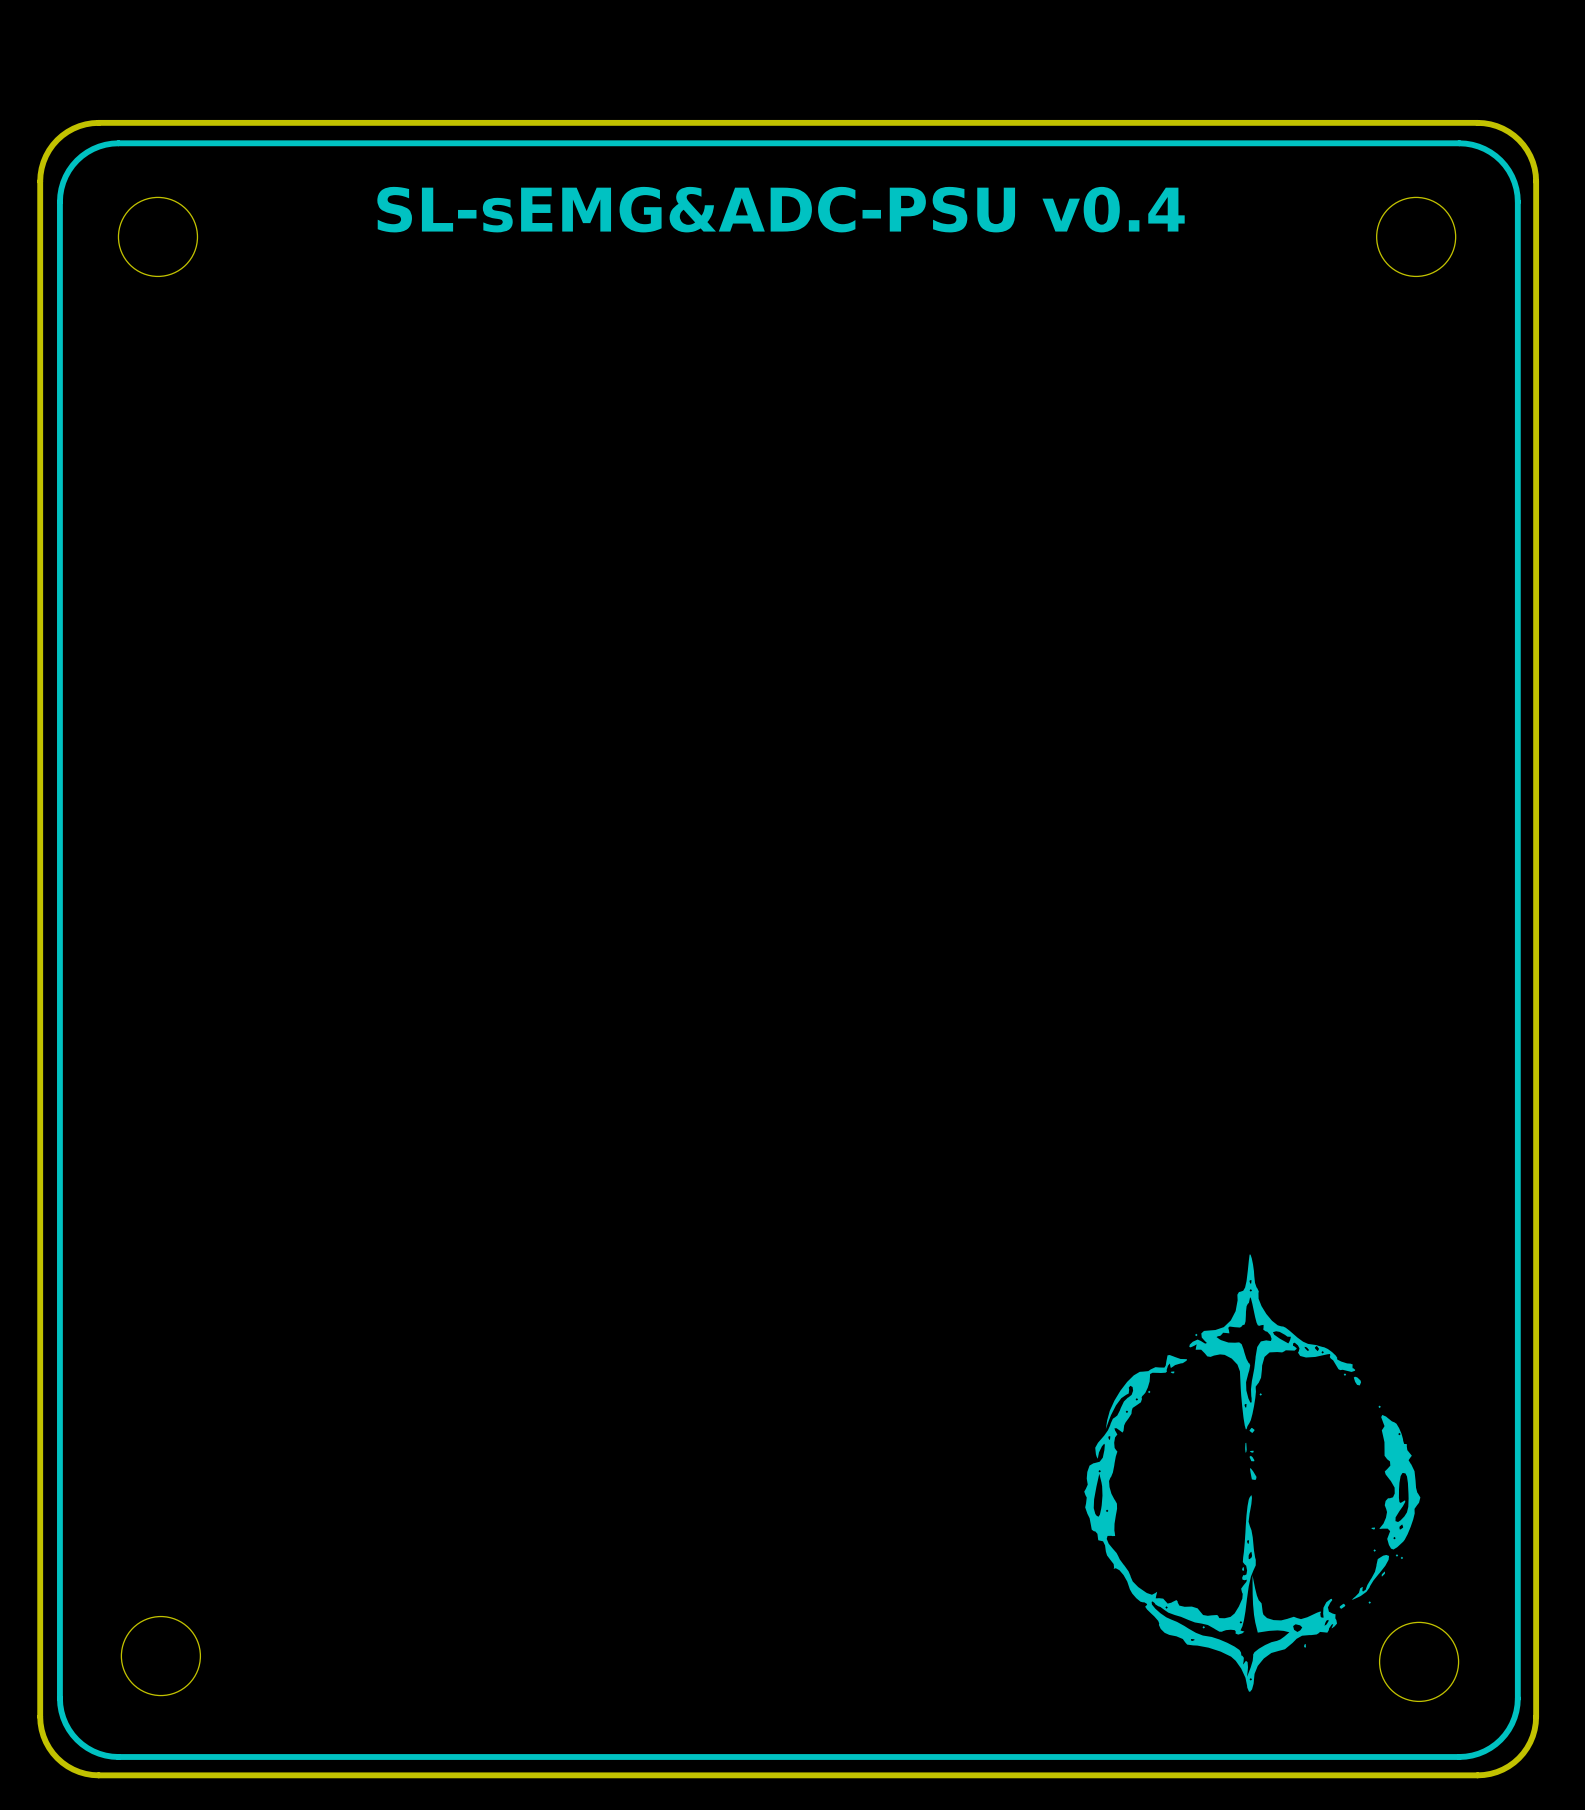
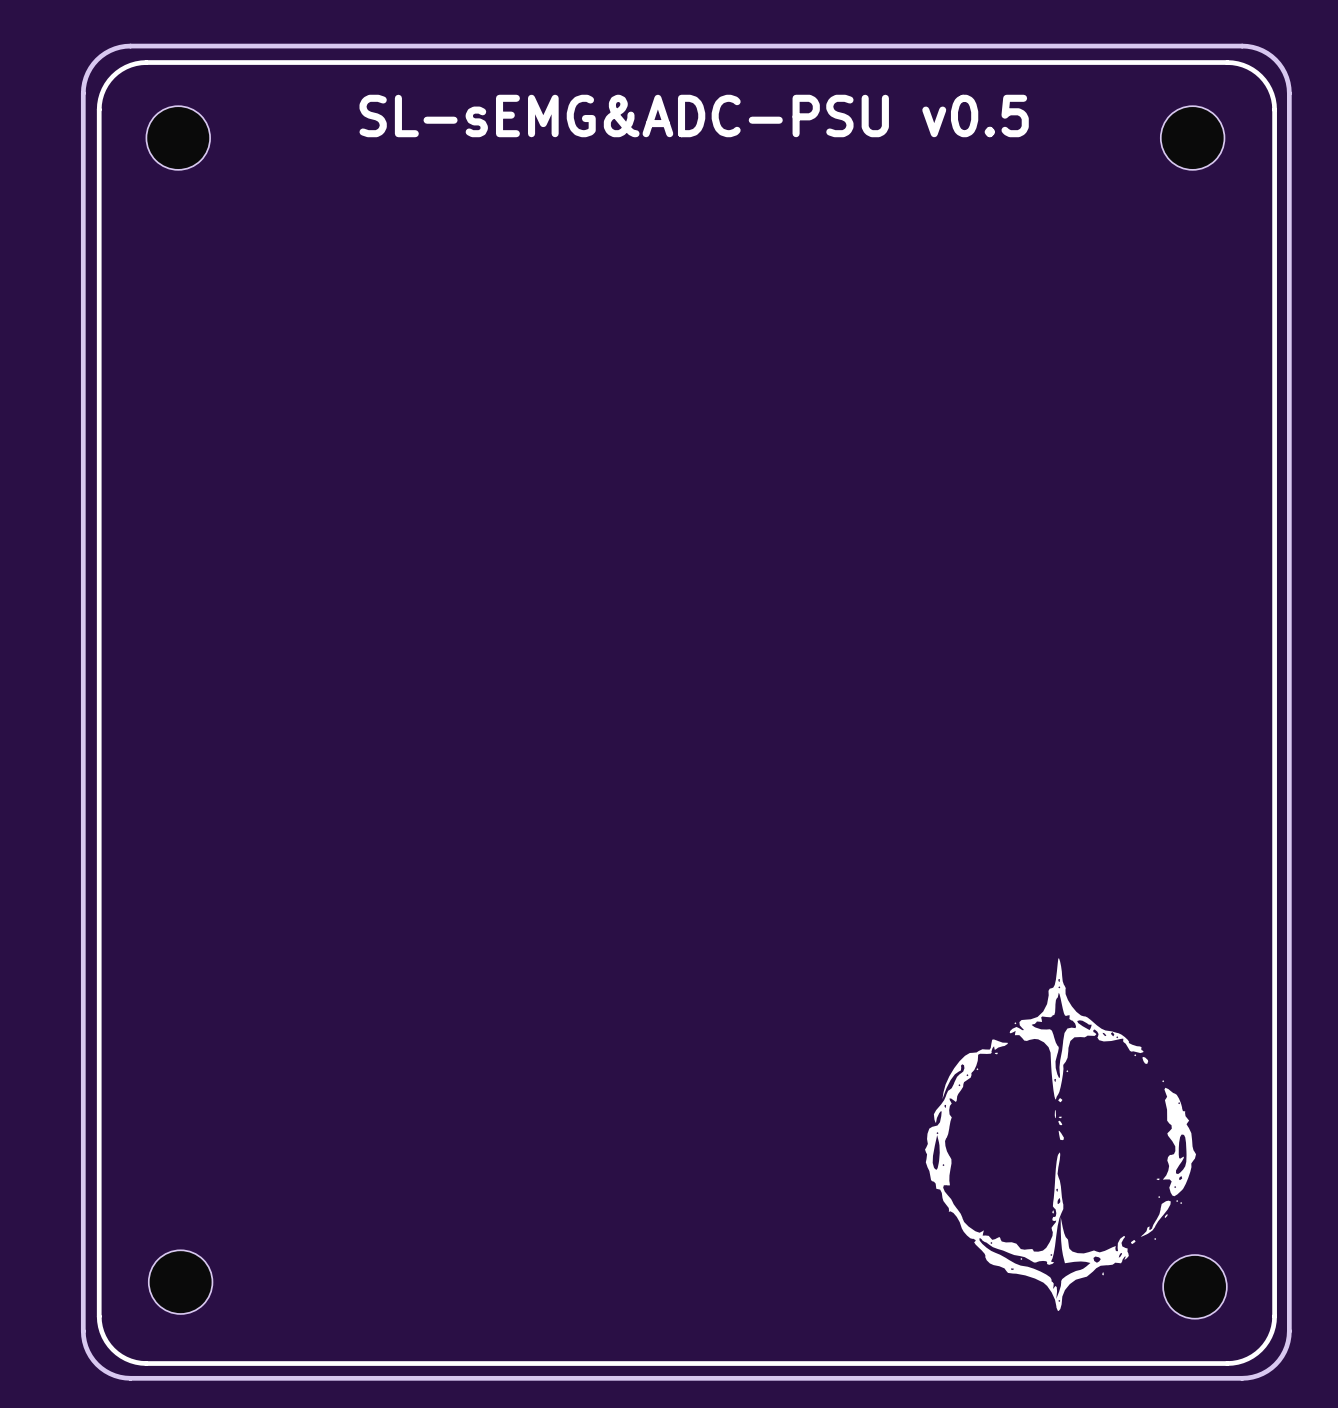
text: SL-sEMG&ADC-PSU v0.4 (781, 209) -> SL-sEMG&ADC-PSU v0.5 (694, 115)

